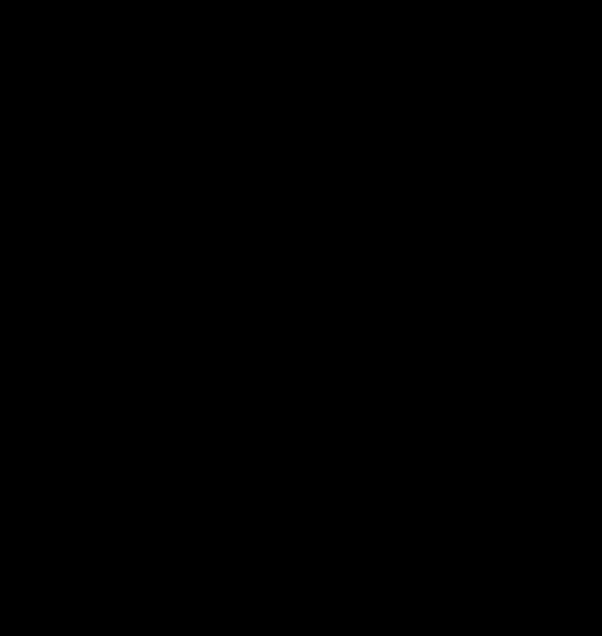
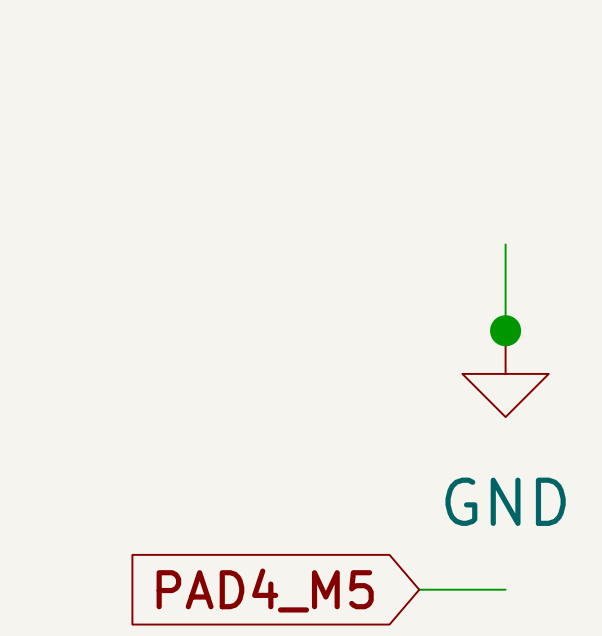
wire: none -> (505, 244) (505, 330)
junction: none -> (505, 330)
power symbol: none -> GND (505, 373)
global label: none -> PAD4_M5 (265, 590)
wire: none -> (419, 589) (505, 589)

